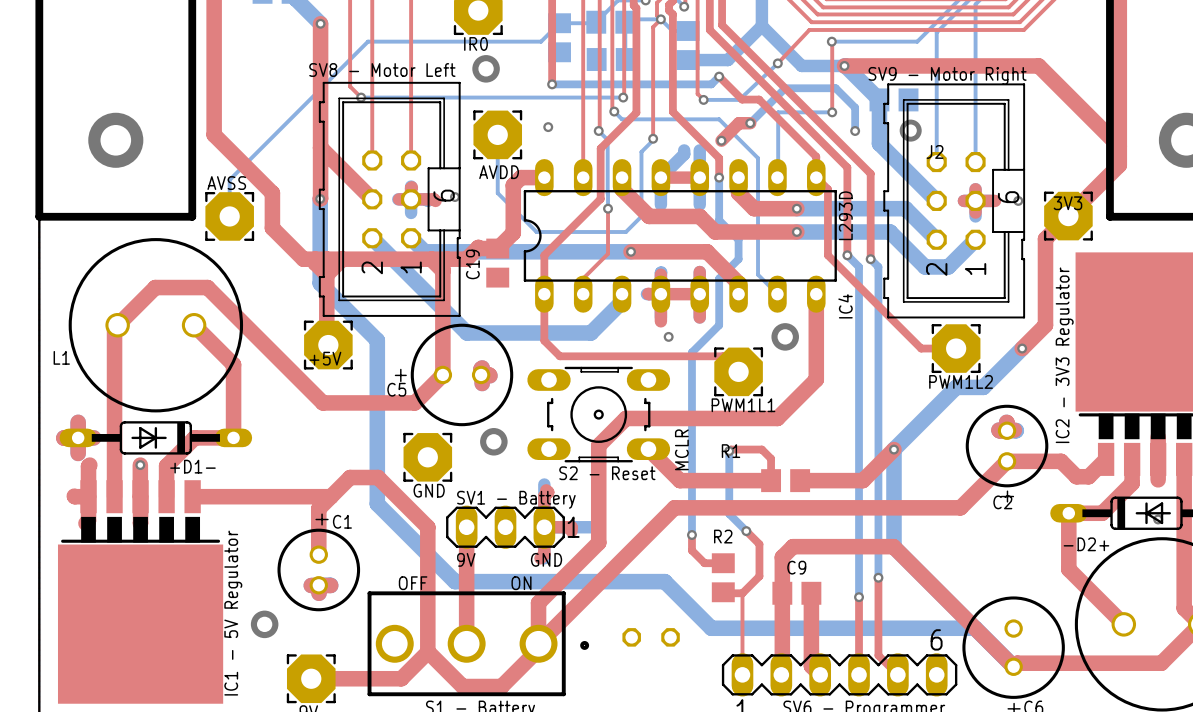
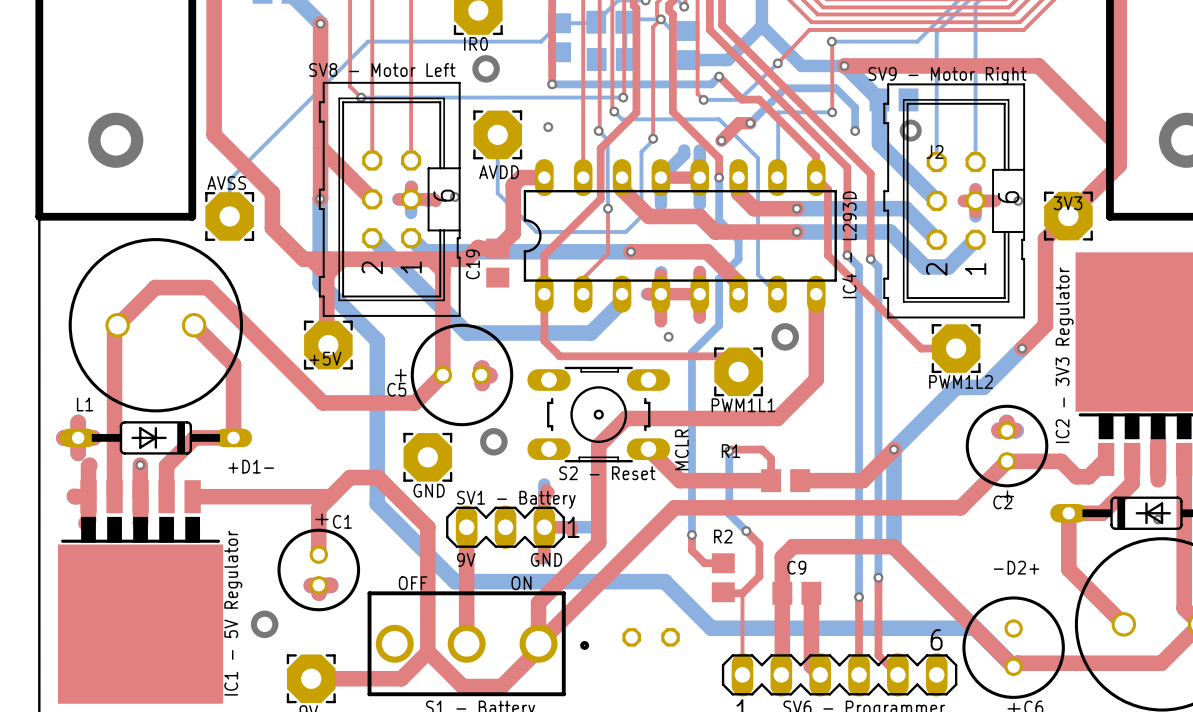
text: IC4 L293D (845, 254) -> IC4 - L293D (849, 244)
text position: L1 (61, 357) -> L1 (85, 404)
text position: +D1- (192, 466) -> +D1- (251, 466)
text position: -D2+ (1086, 544) -> -D2+ (1016, 567)

